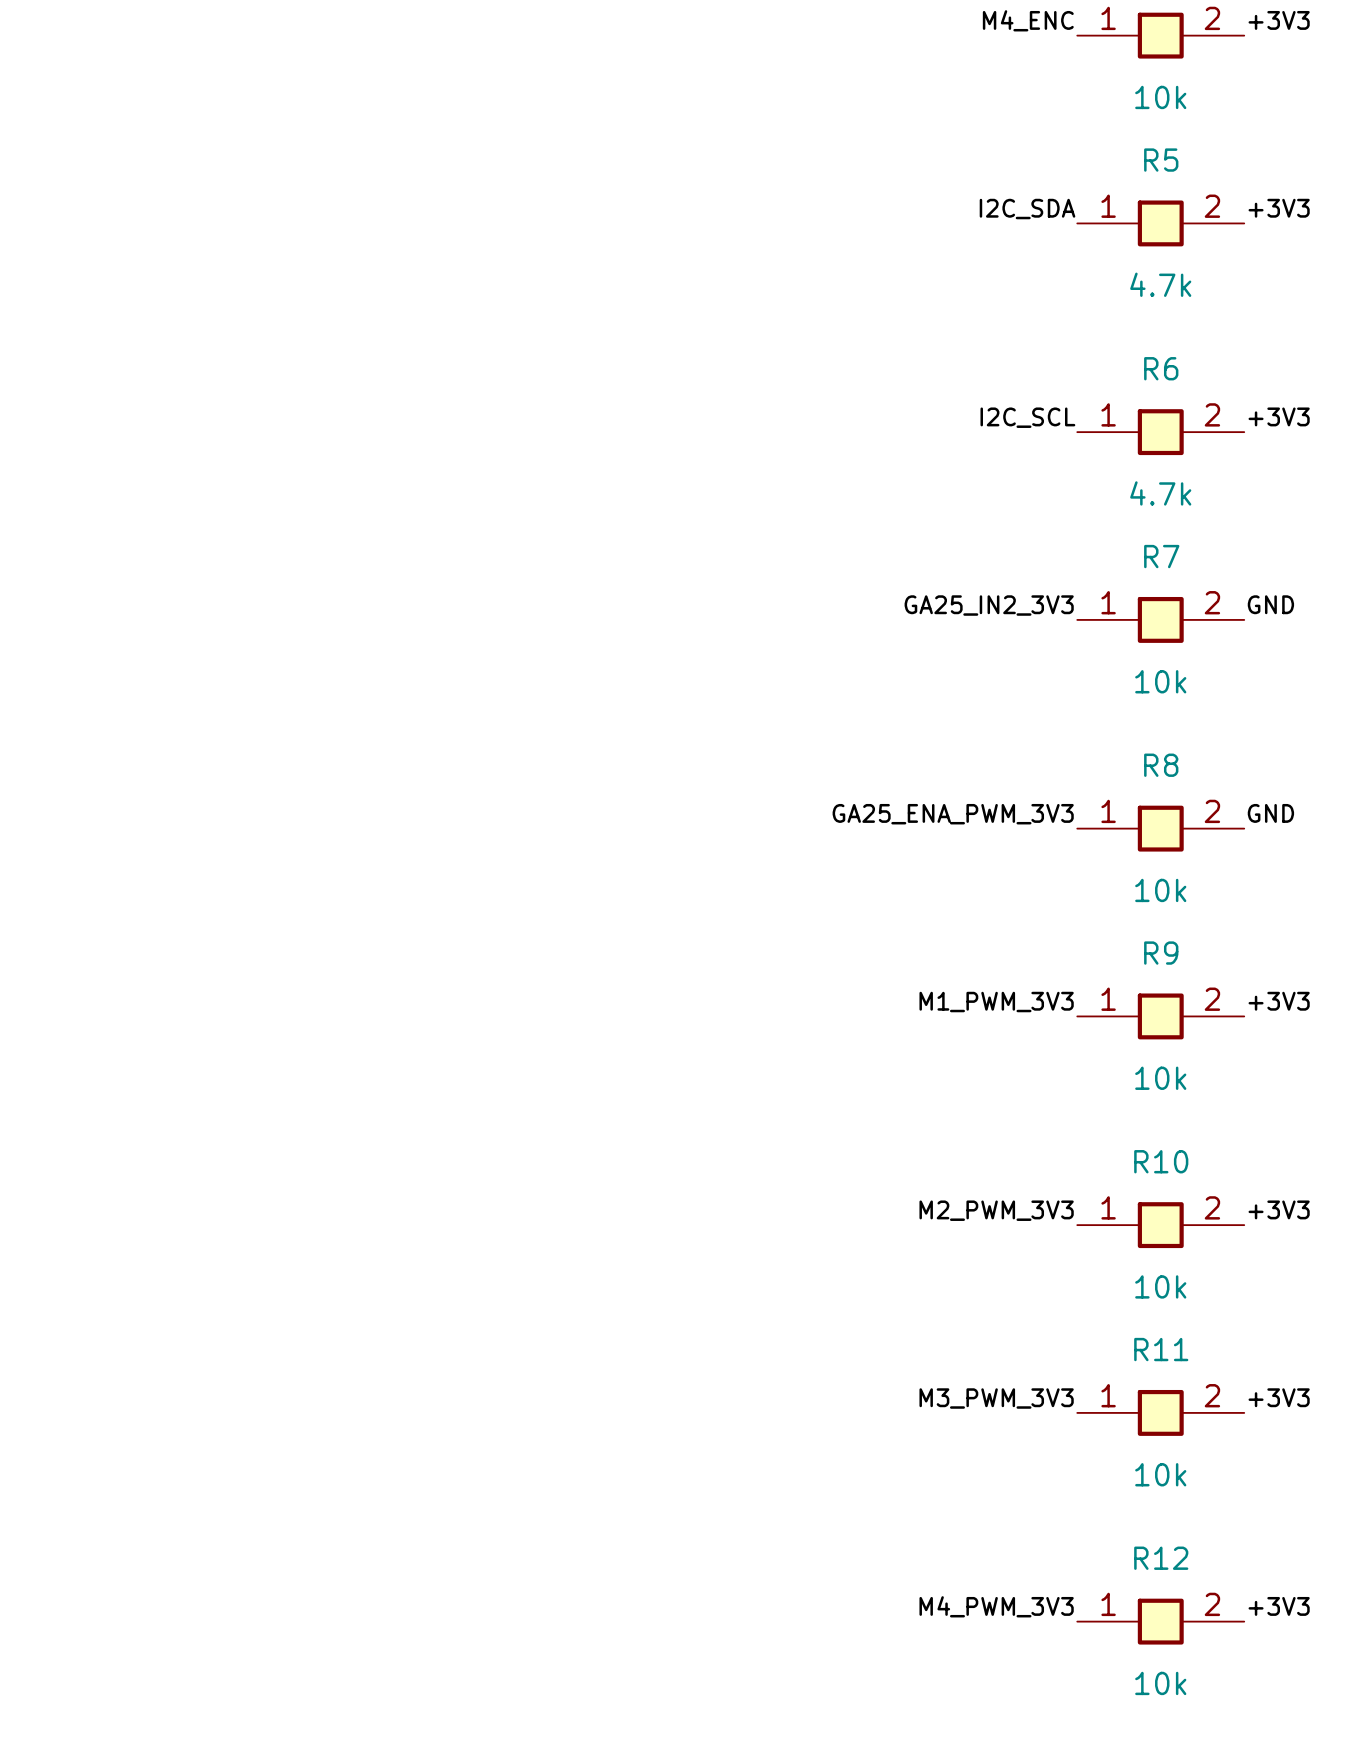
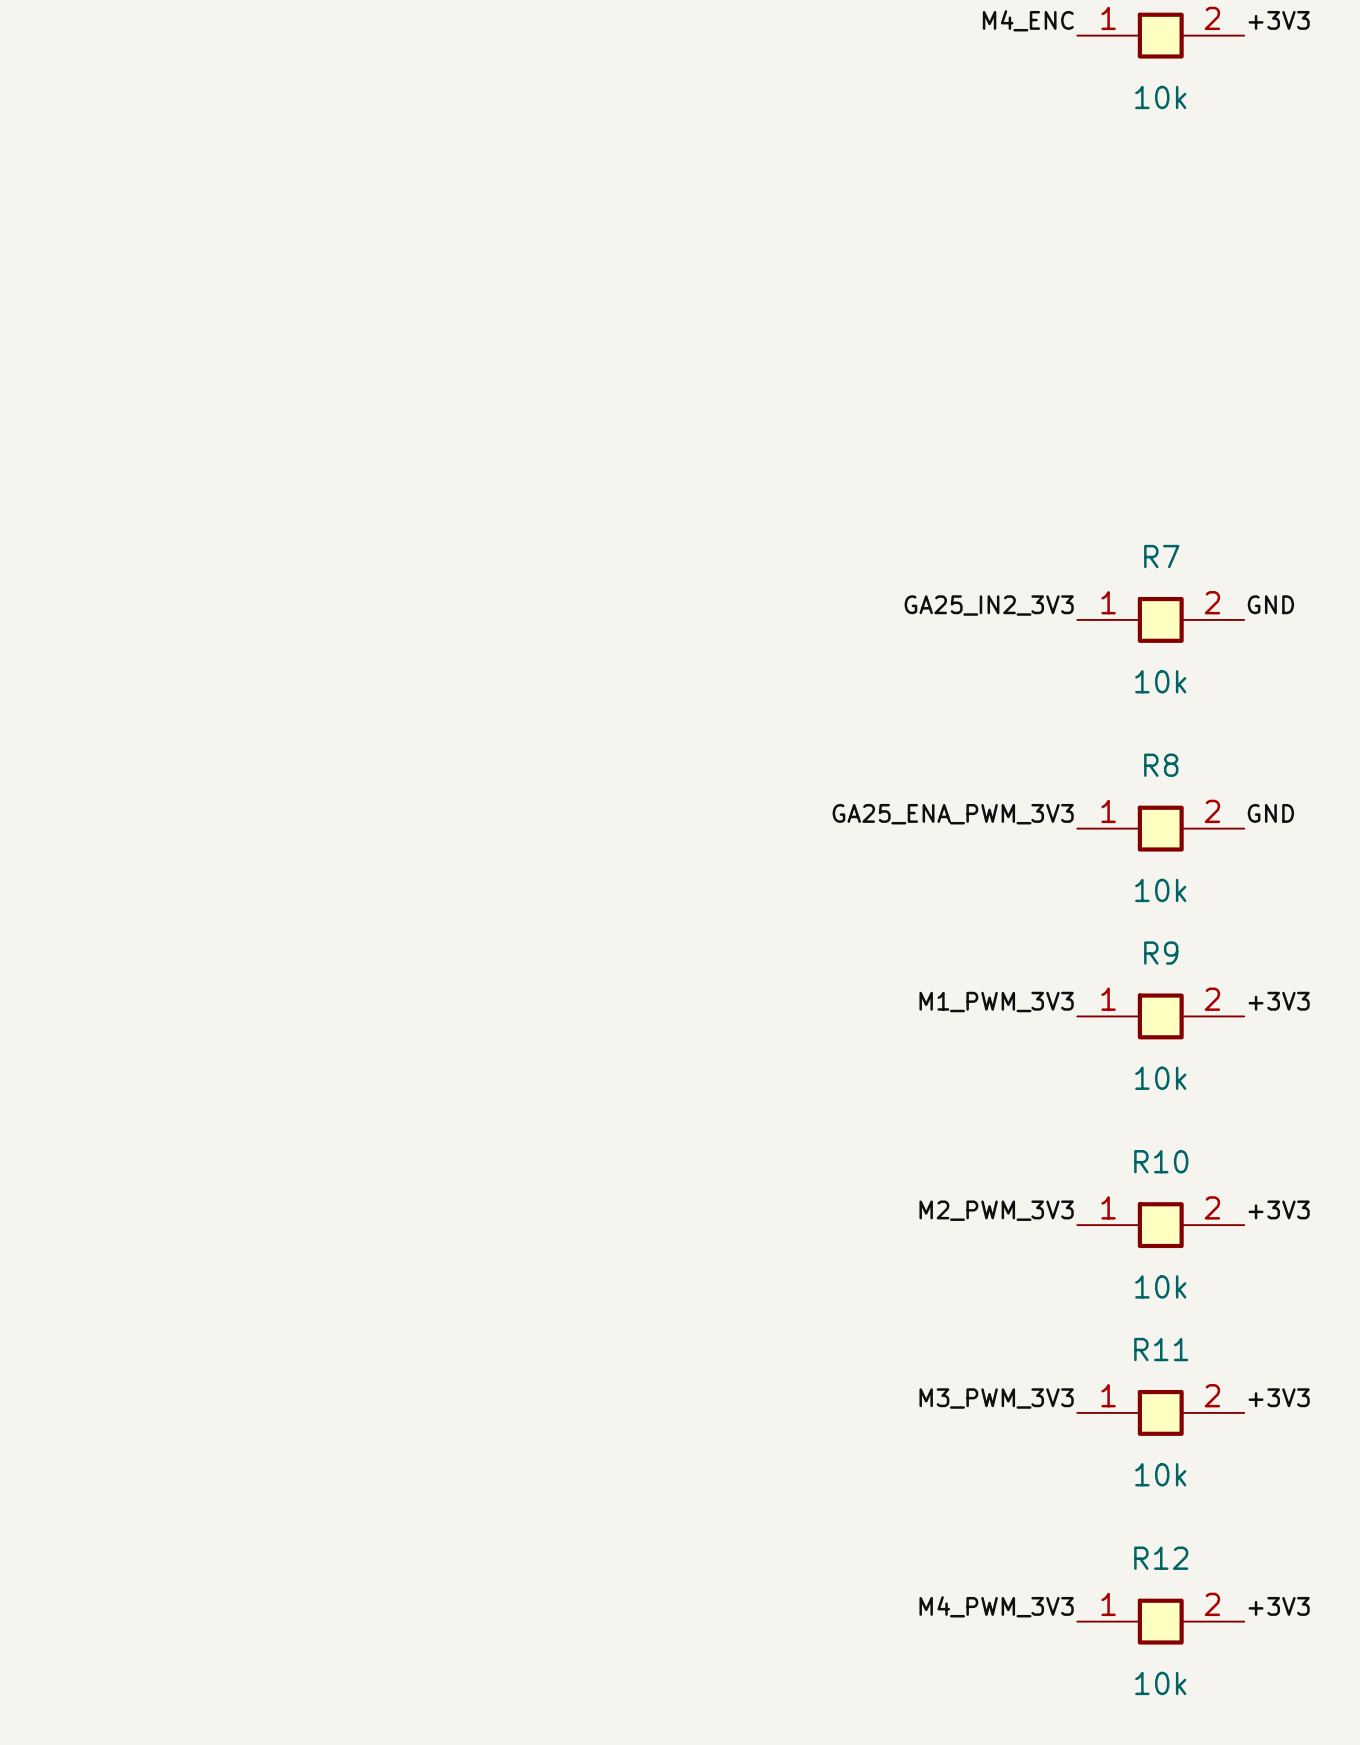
label: +3V3 (1279, 208) -> none
label: I2C_SDA (1027, 209) -> none
R5: 4.7k (1160, 223) -> none
label: +3V3 (1279, 416) -> none
label: I2C_SCL (1027, 417) -> none
R6: 4.7k (1160, 432) -> none

